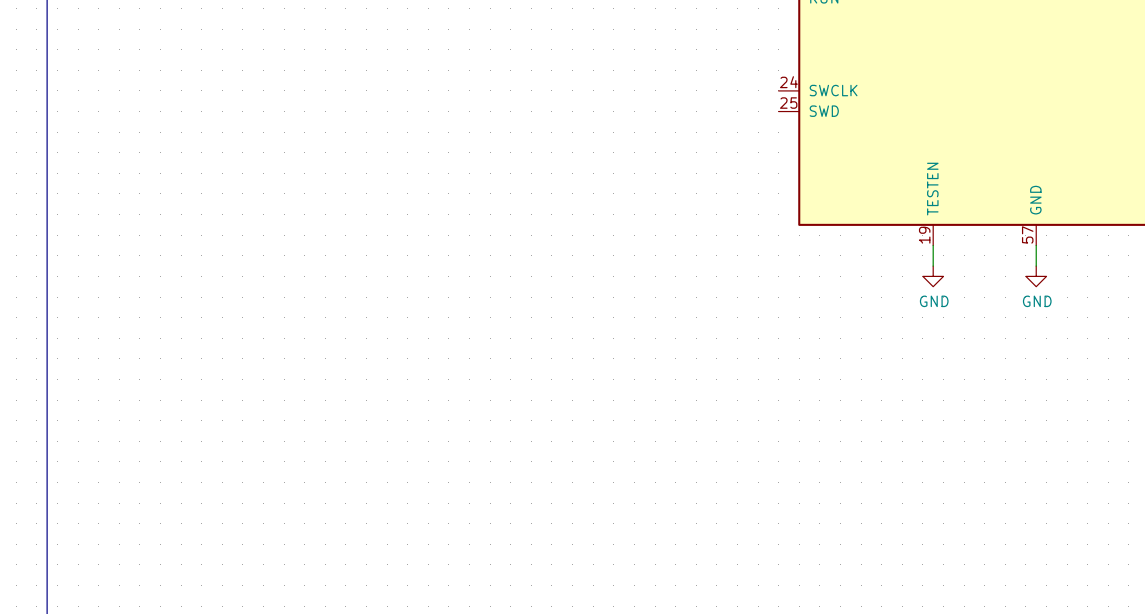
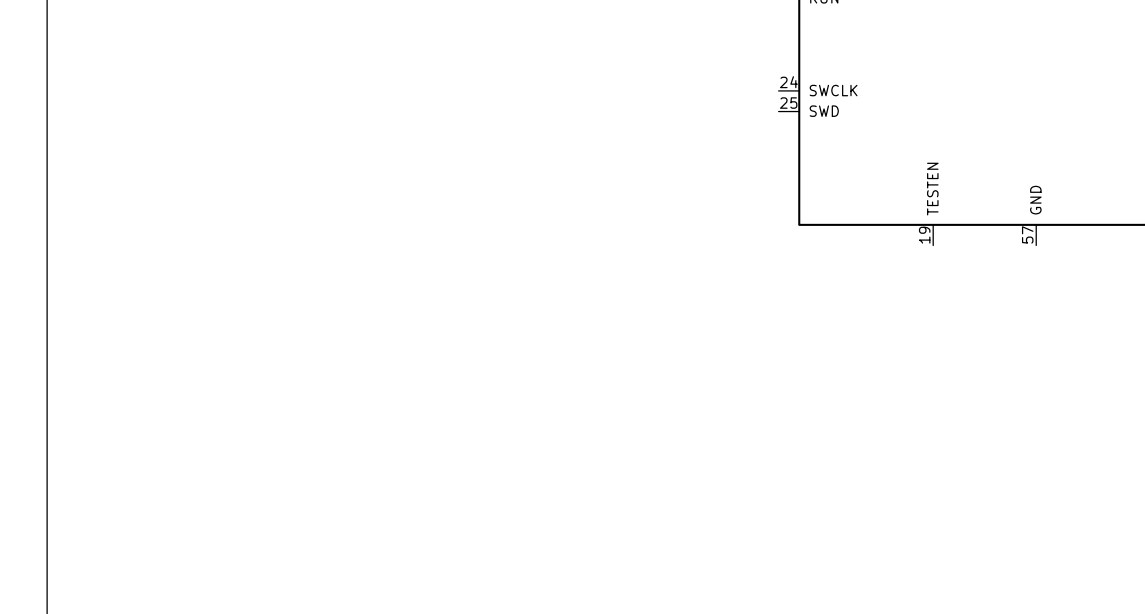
wire: (933, 245) (933, 266) -> none
wire: (1036, 245) (1036, 266) -> none
power symbol: GND (933, 276) -> none
power symbol: GND (1036, 276) -> none

